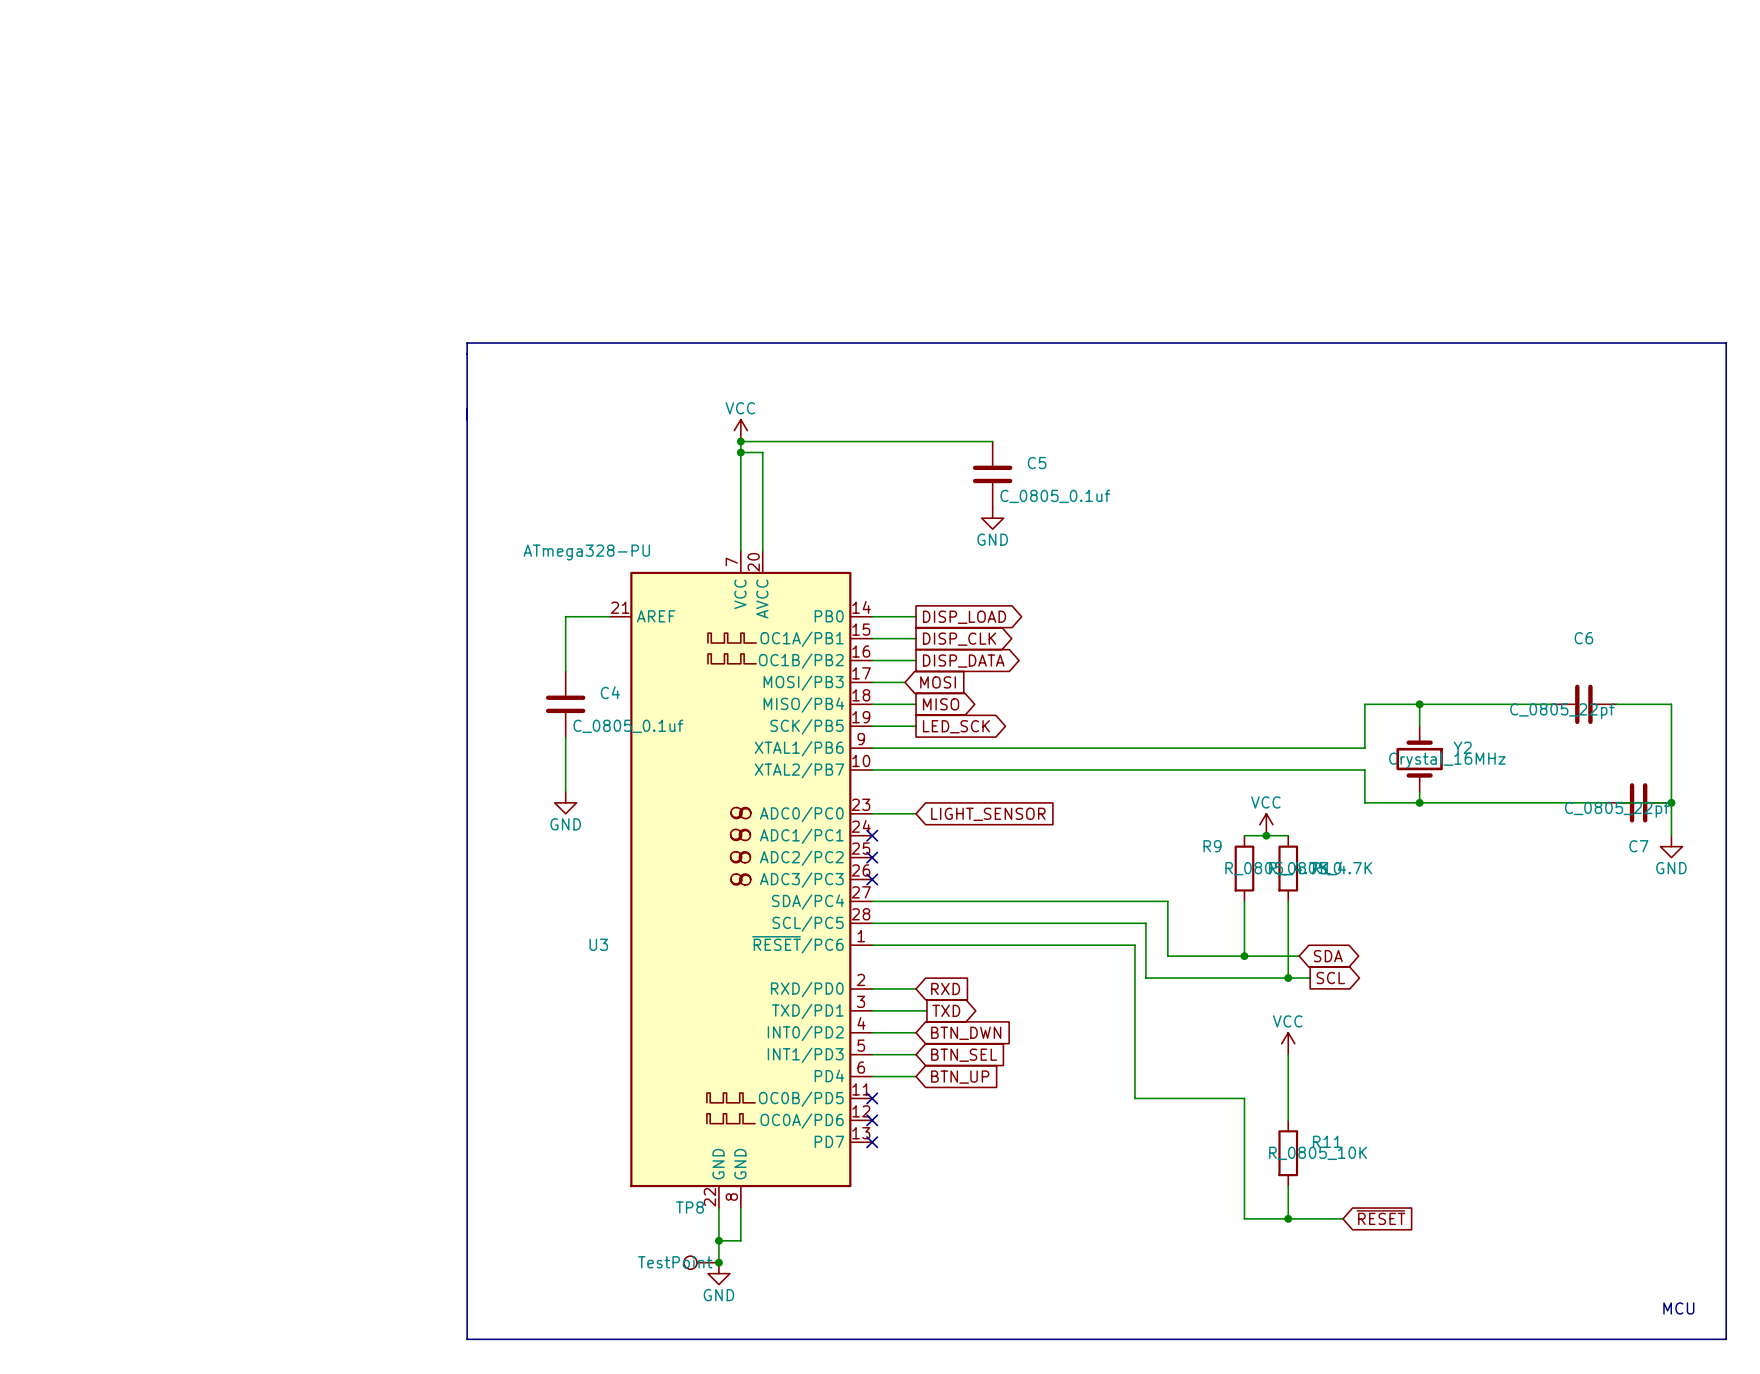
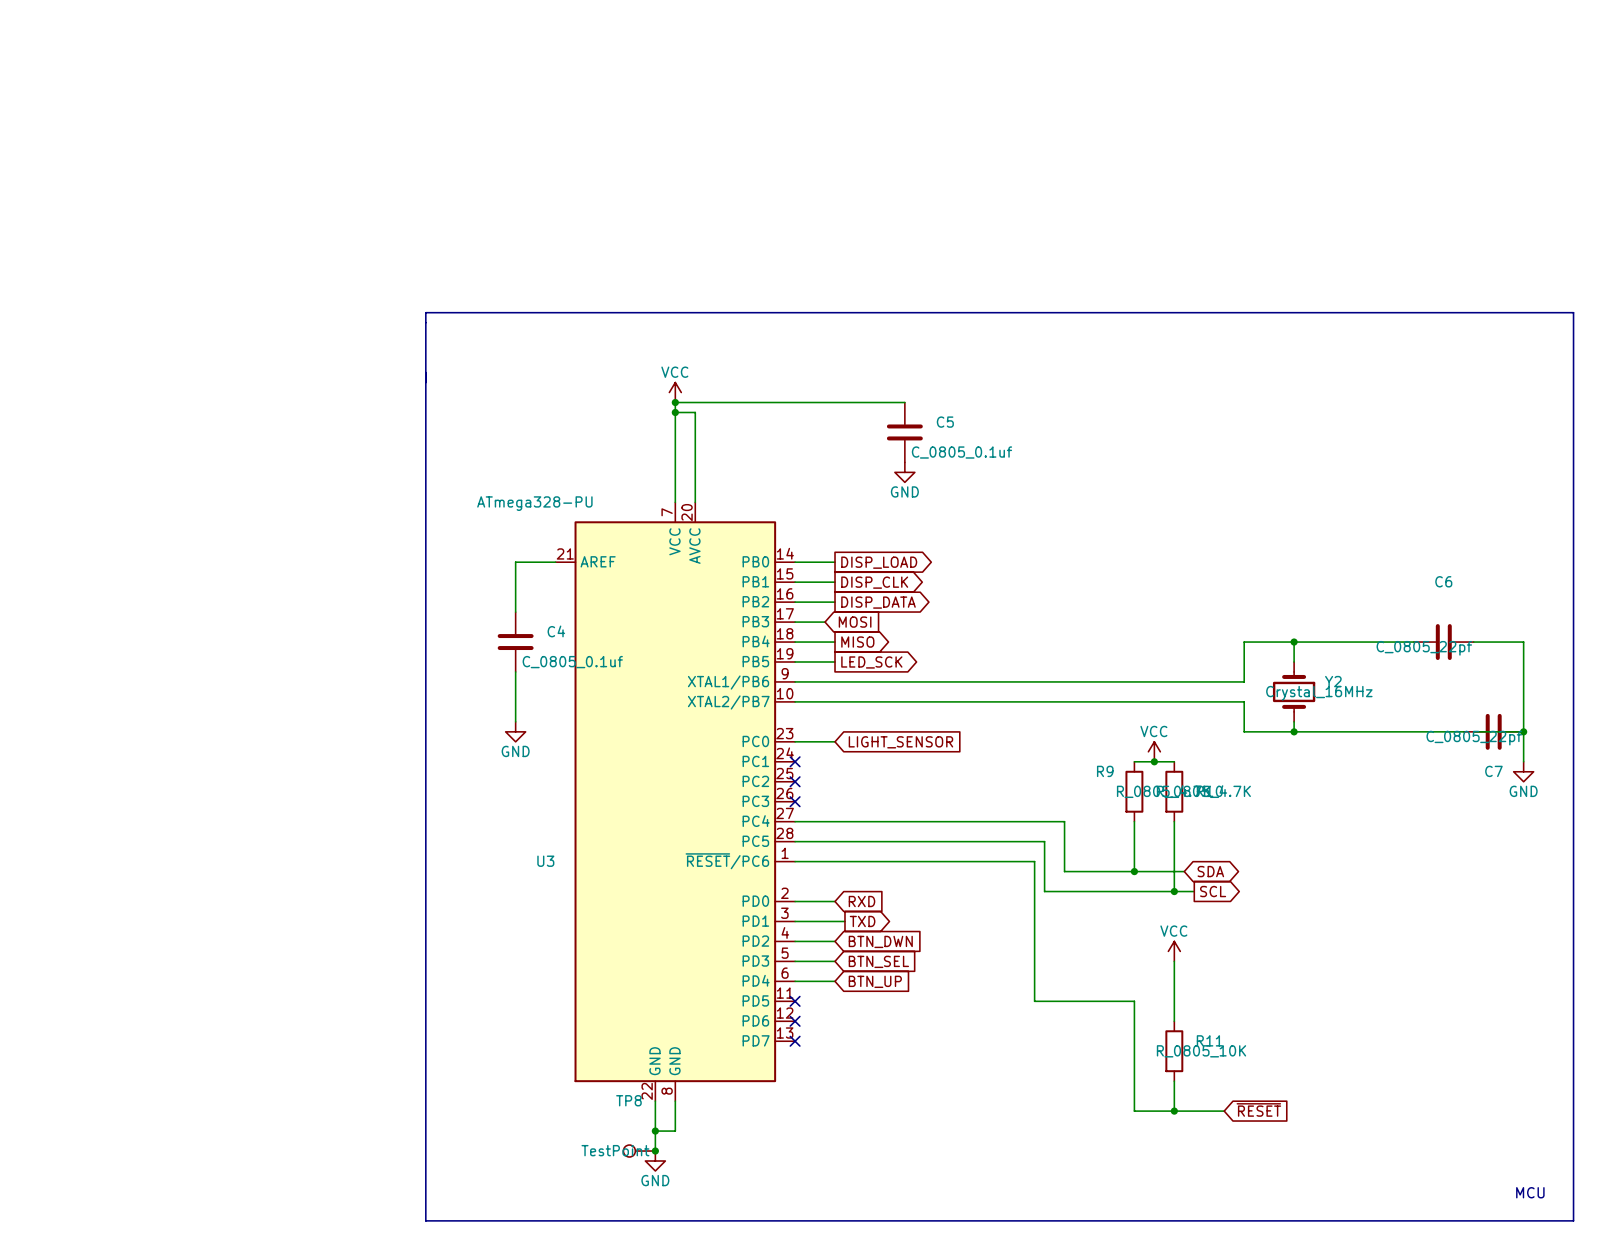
U3 symbol: [609, 551, 873, 1208] -> [555, 502, 796, 1102]

